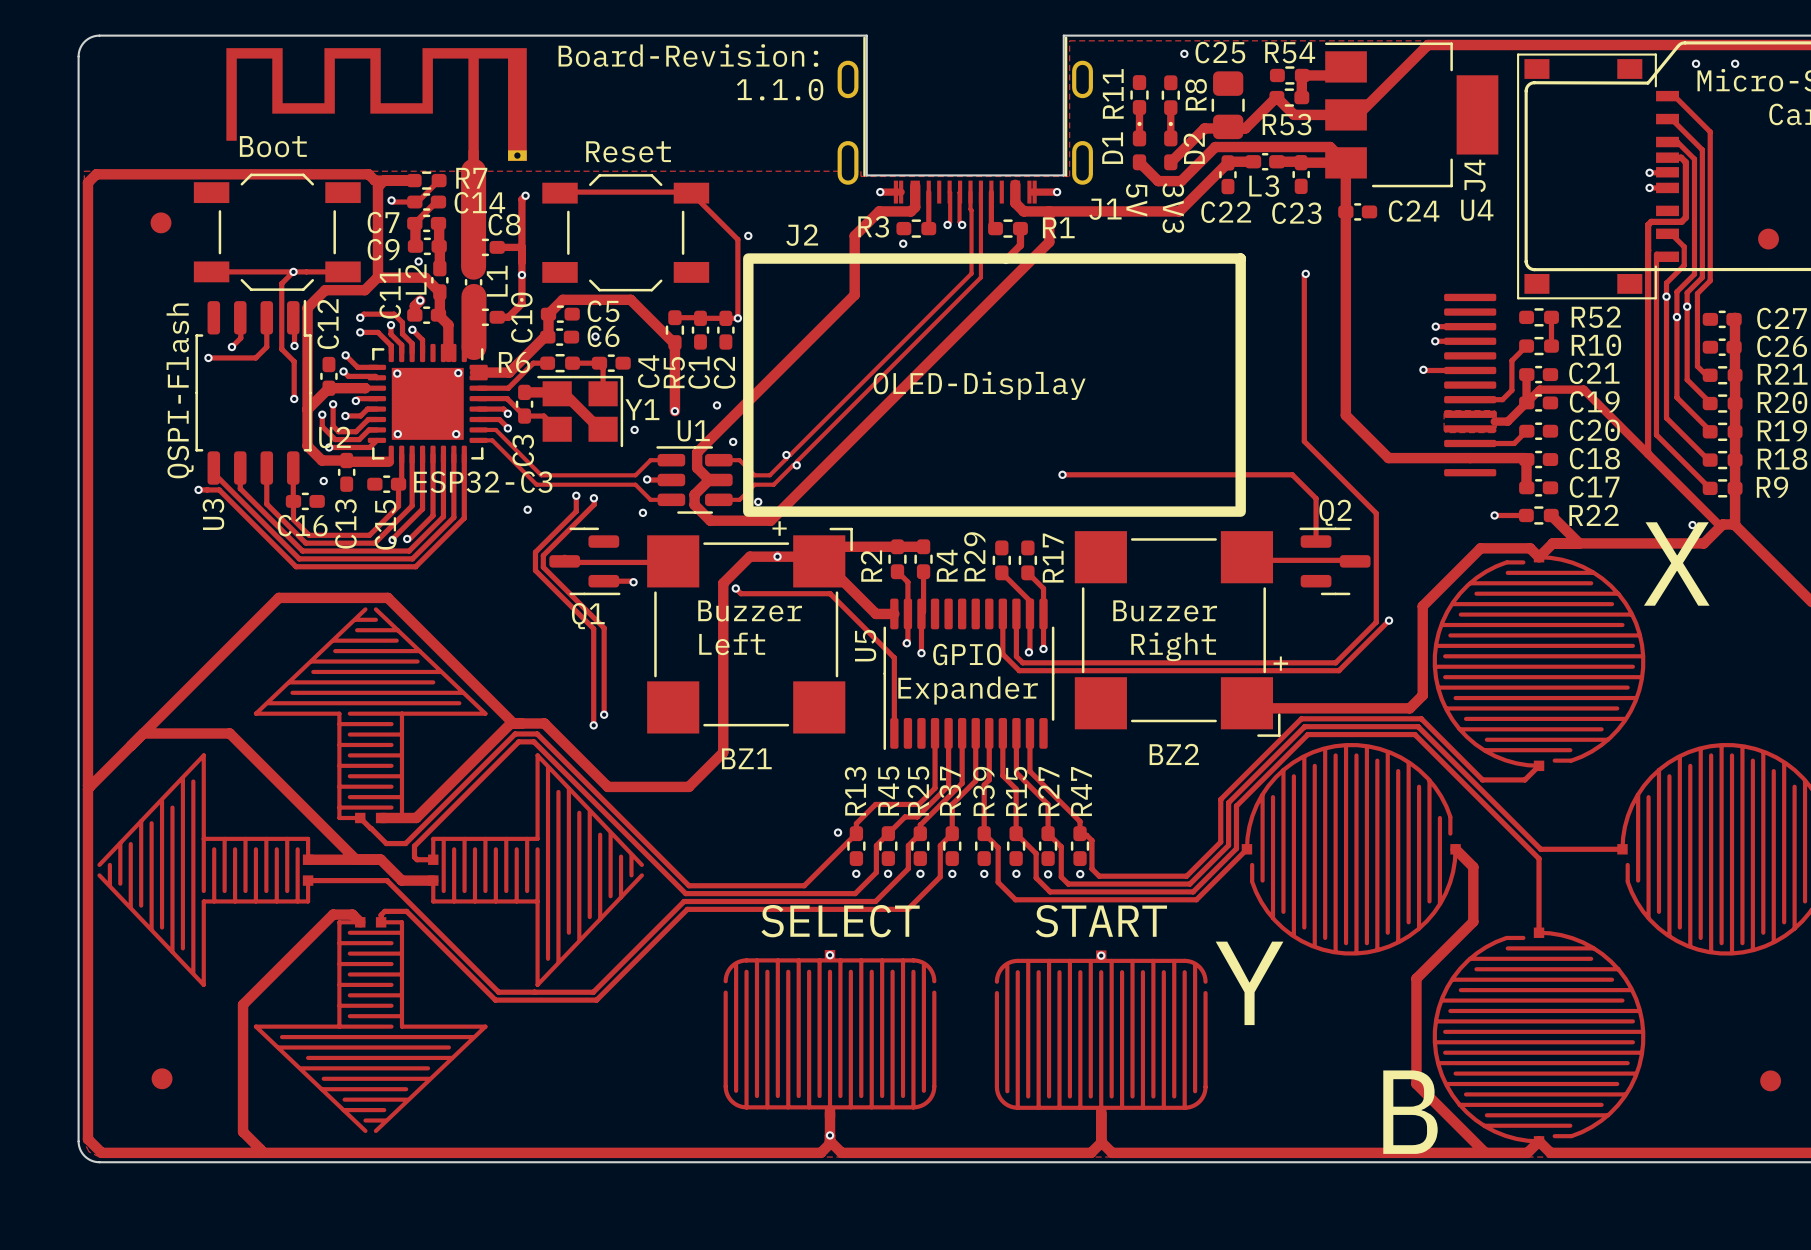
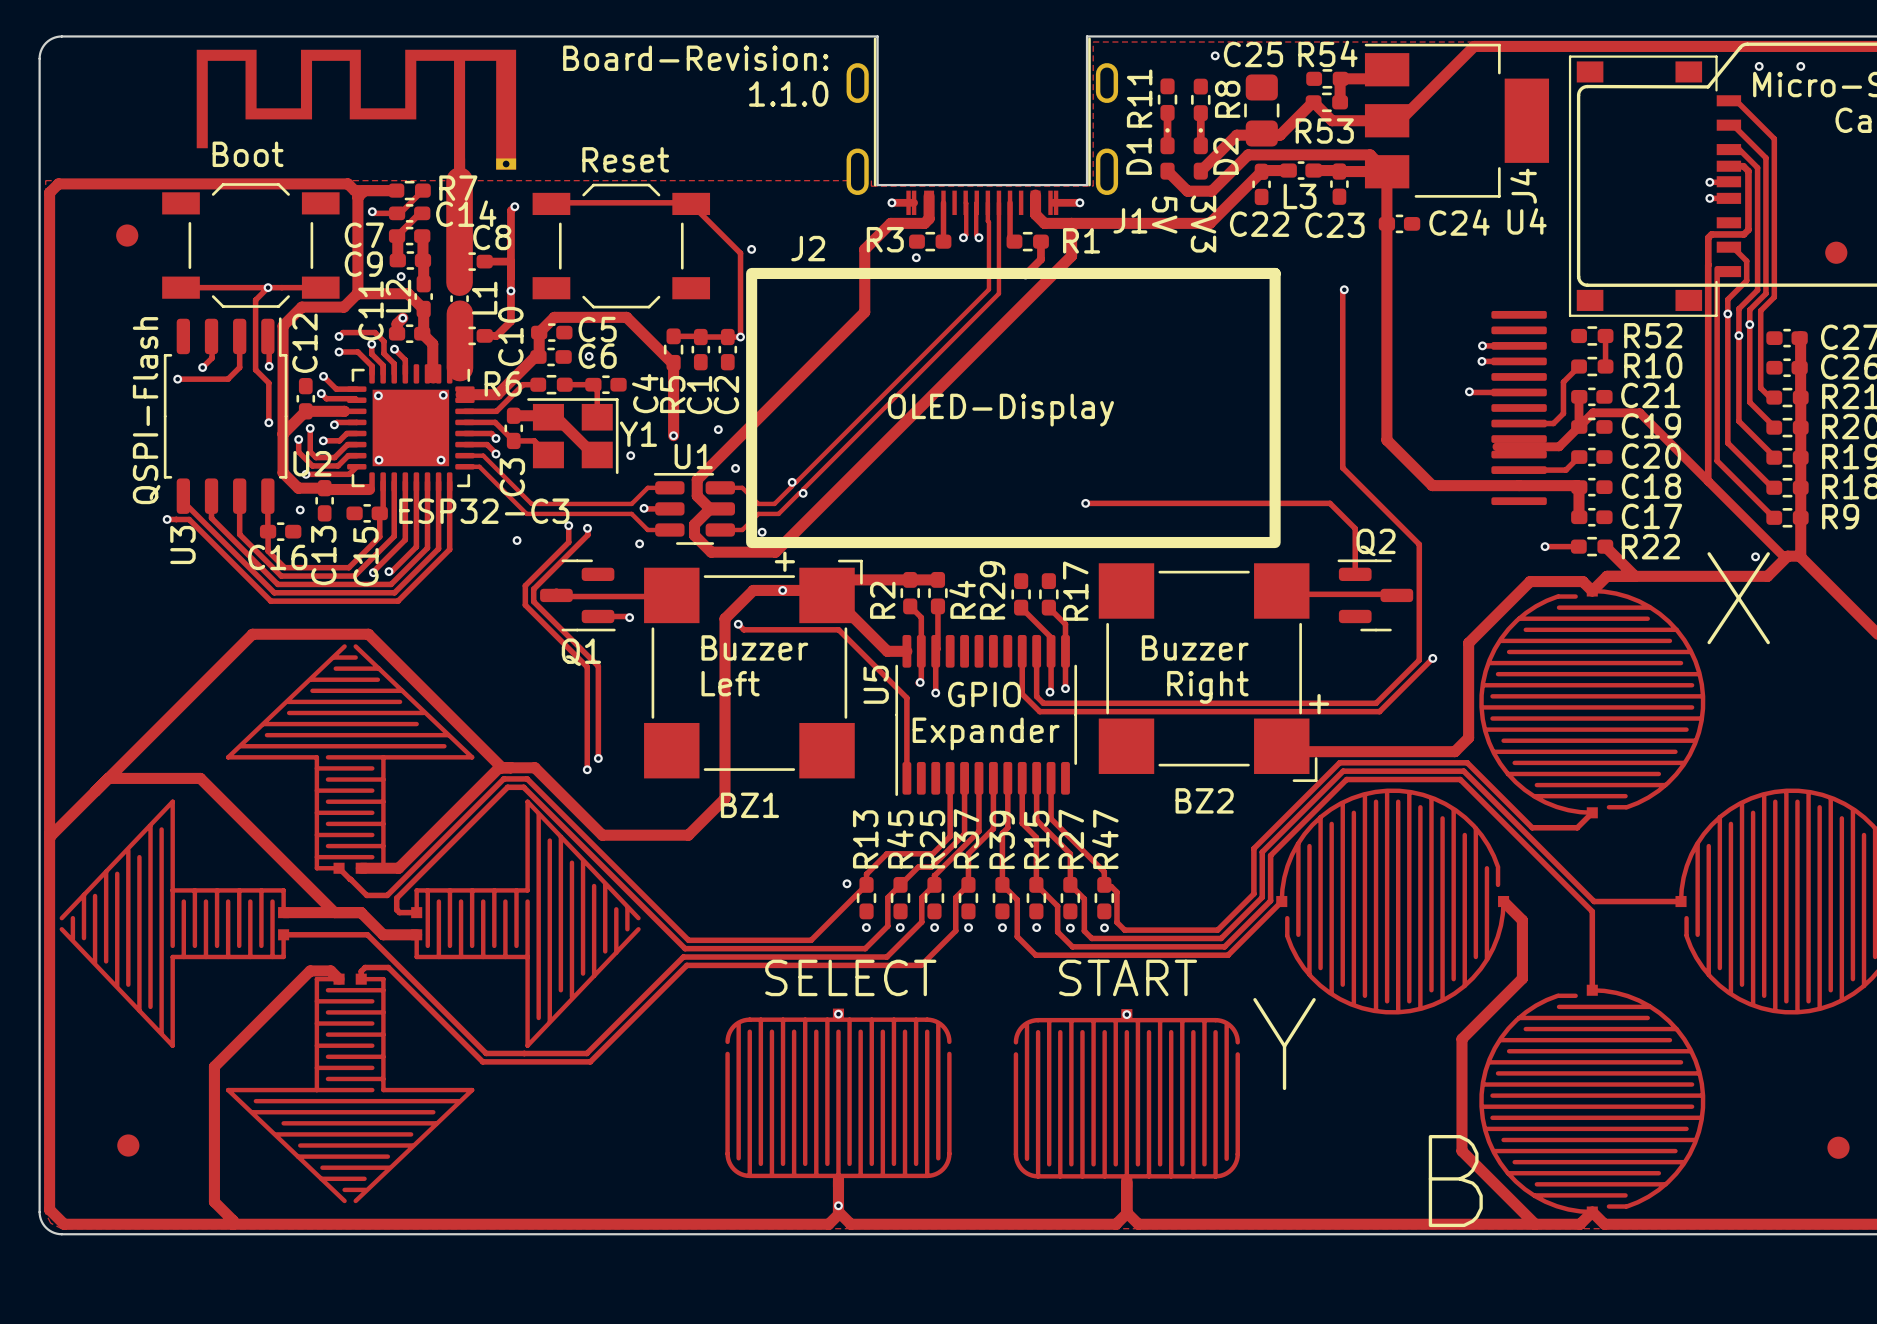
zone outline: (1445, 410) (1444, 430) (1446, 432) (1494, 432) (1496, 430) (1496, 412) (1494, 410) (1445, 410) -> none
track: none -> (1496, 446) (1545, 446)

